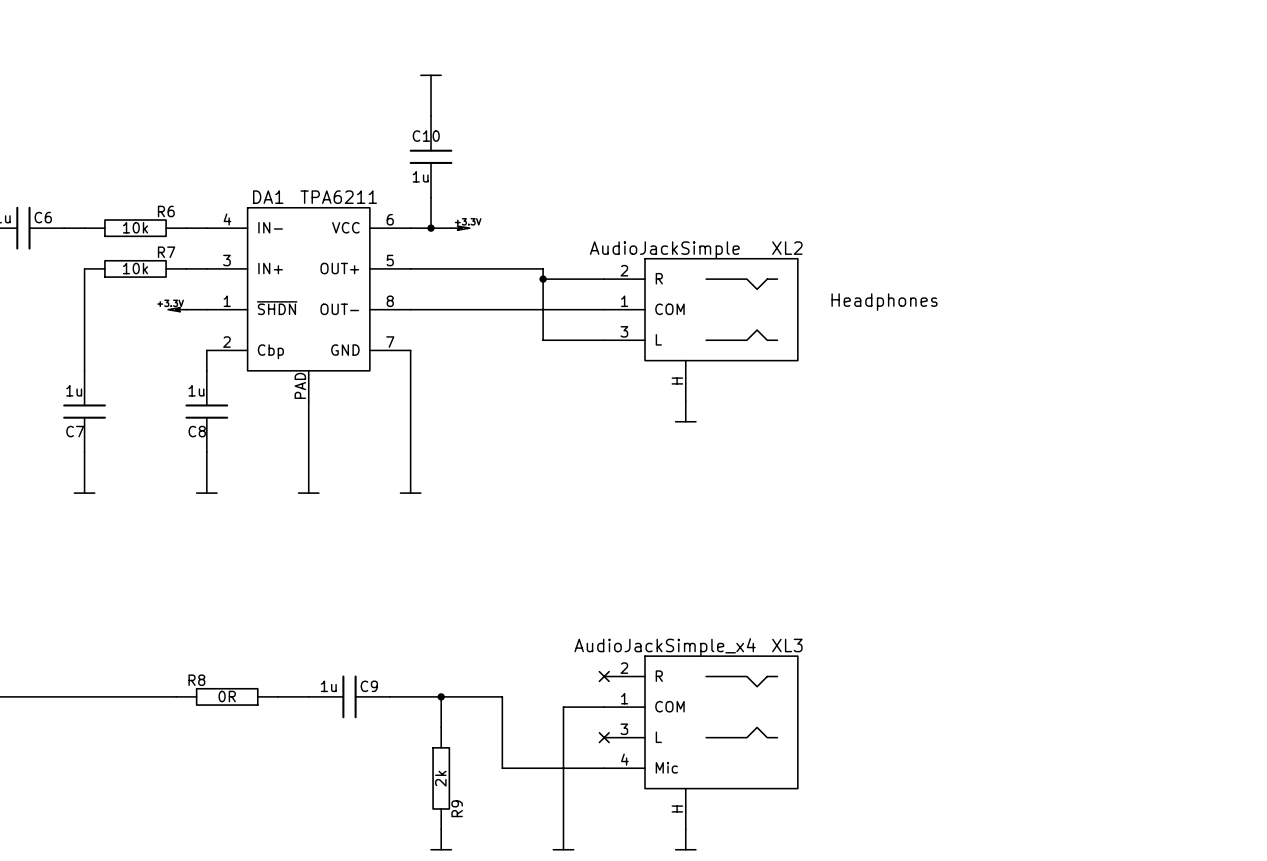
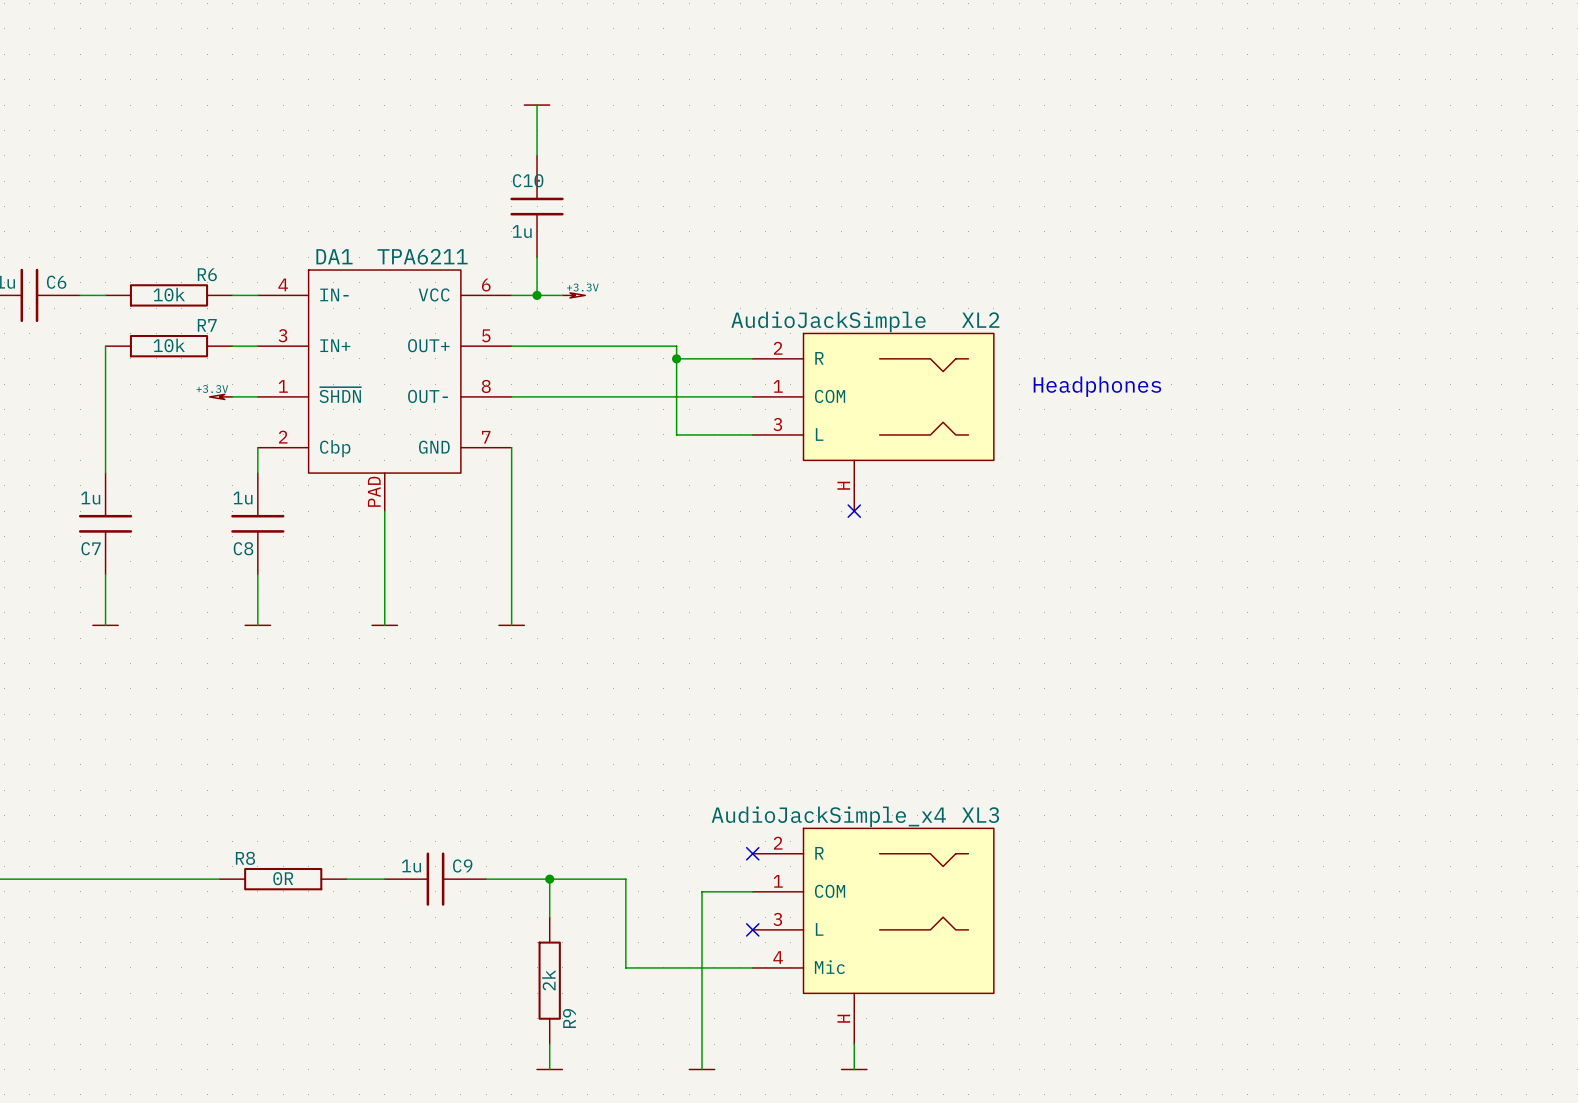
wire: (685, 401) (685, 421) -> none
no-connect mark: none -> (854, 511)
power symbol: (685, 421) -> none

